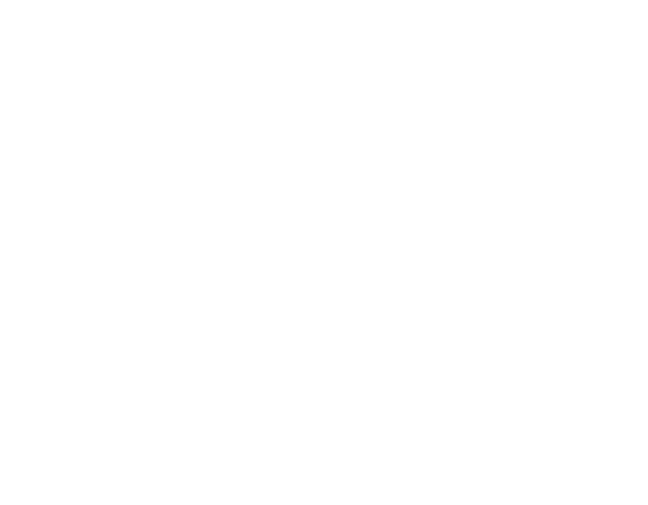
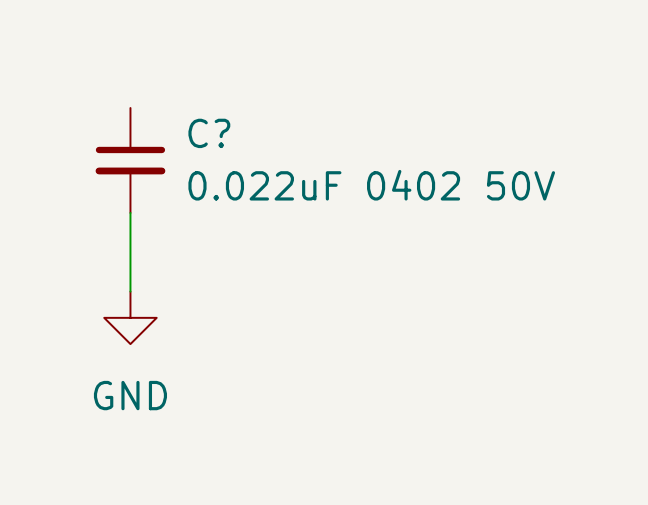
C?: none -> 0.022uF 0402 50V (130, 160)
wire: none -> (130, 212) (130, 291)
power symbol: none -> GND (130, 317)

